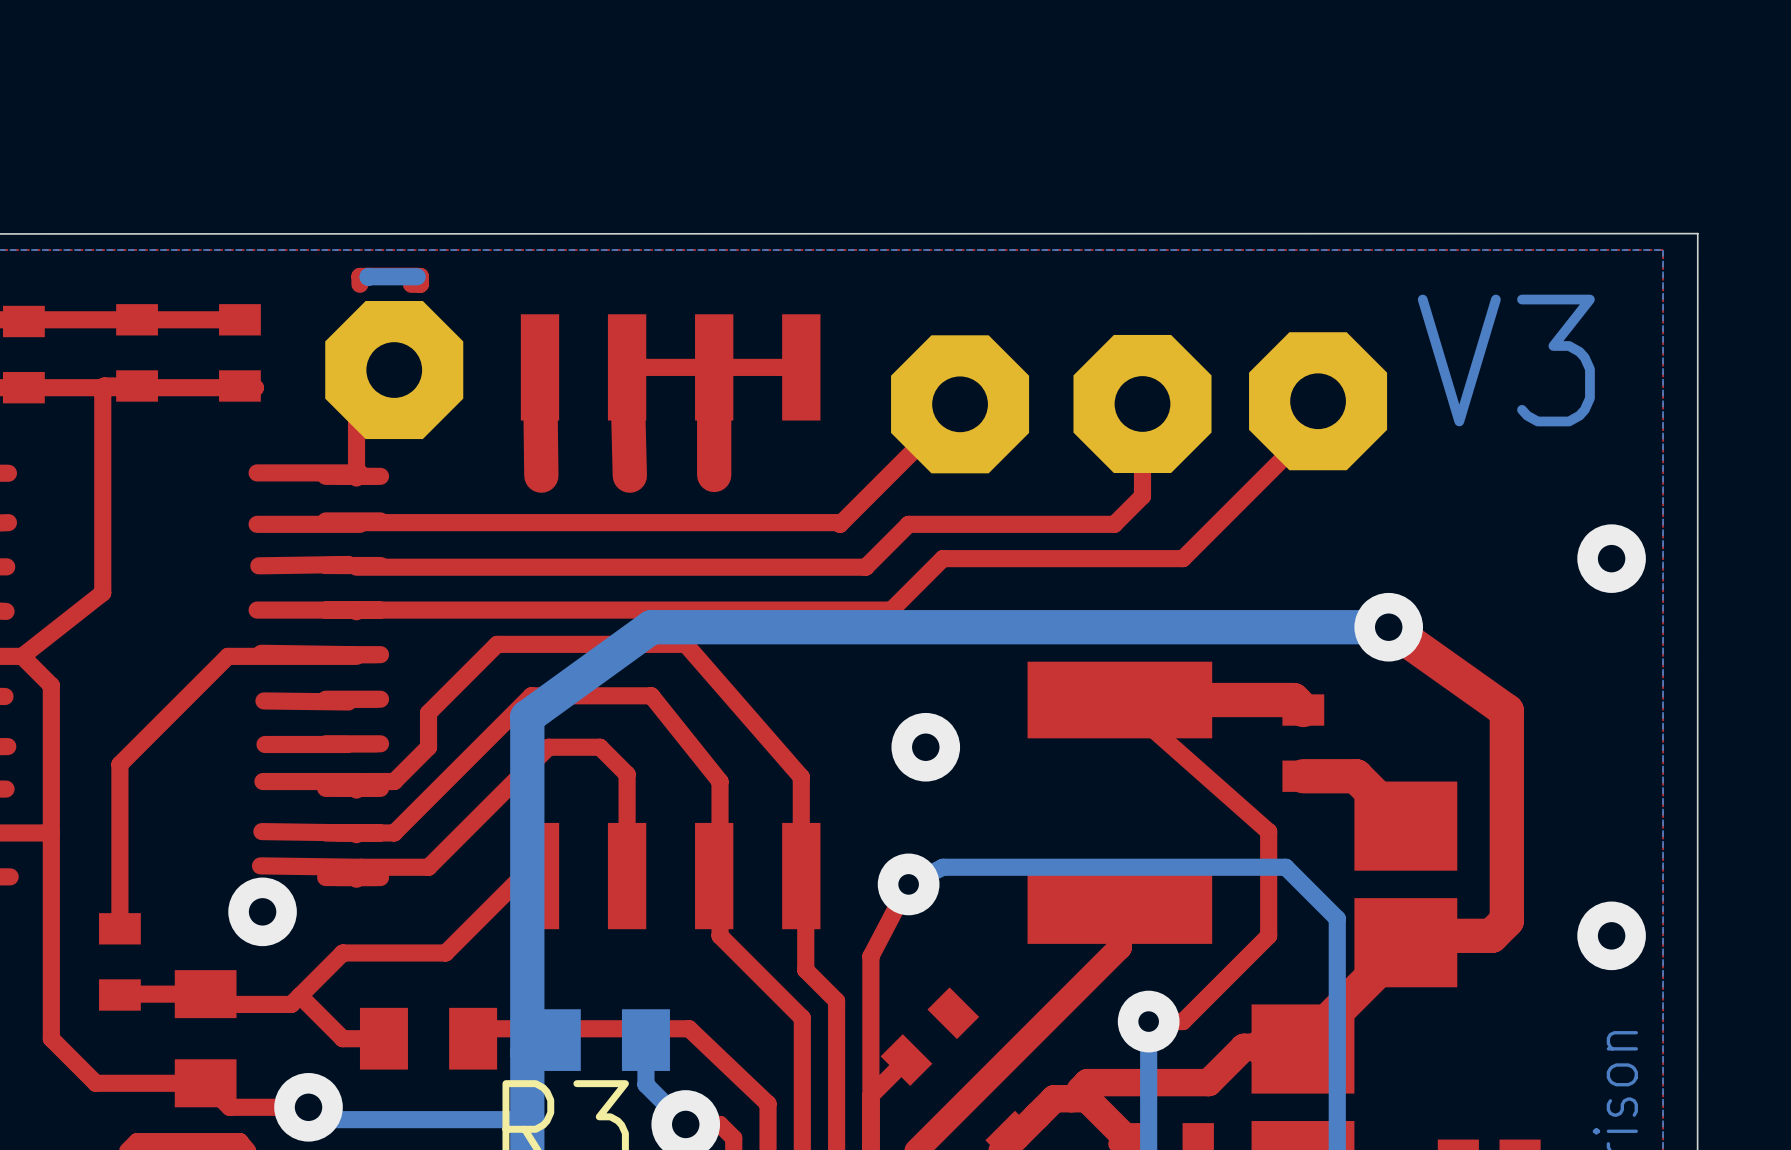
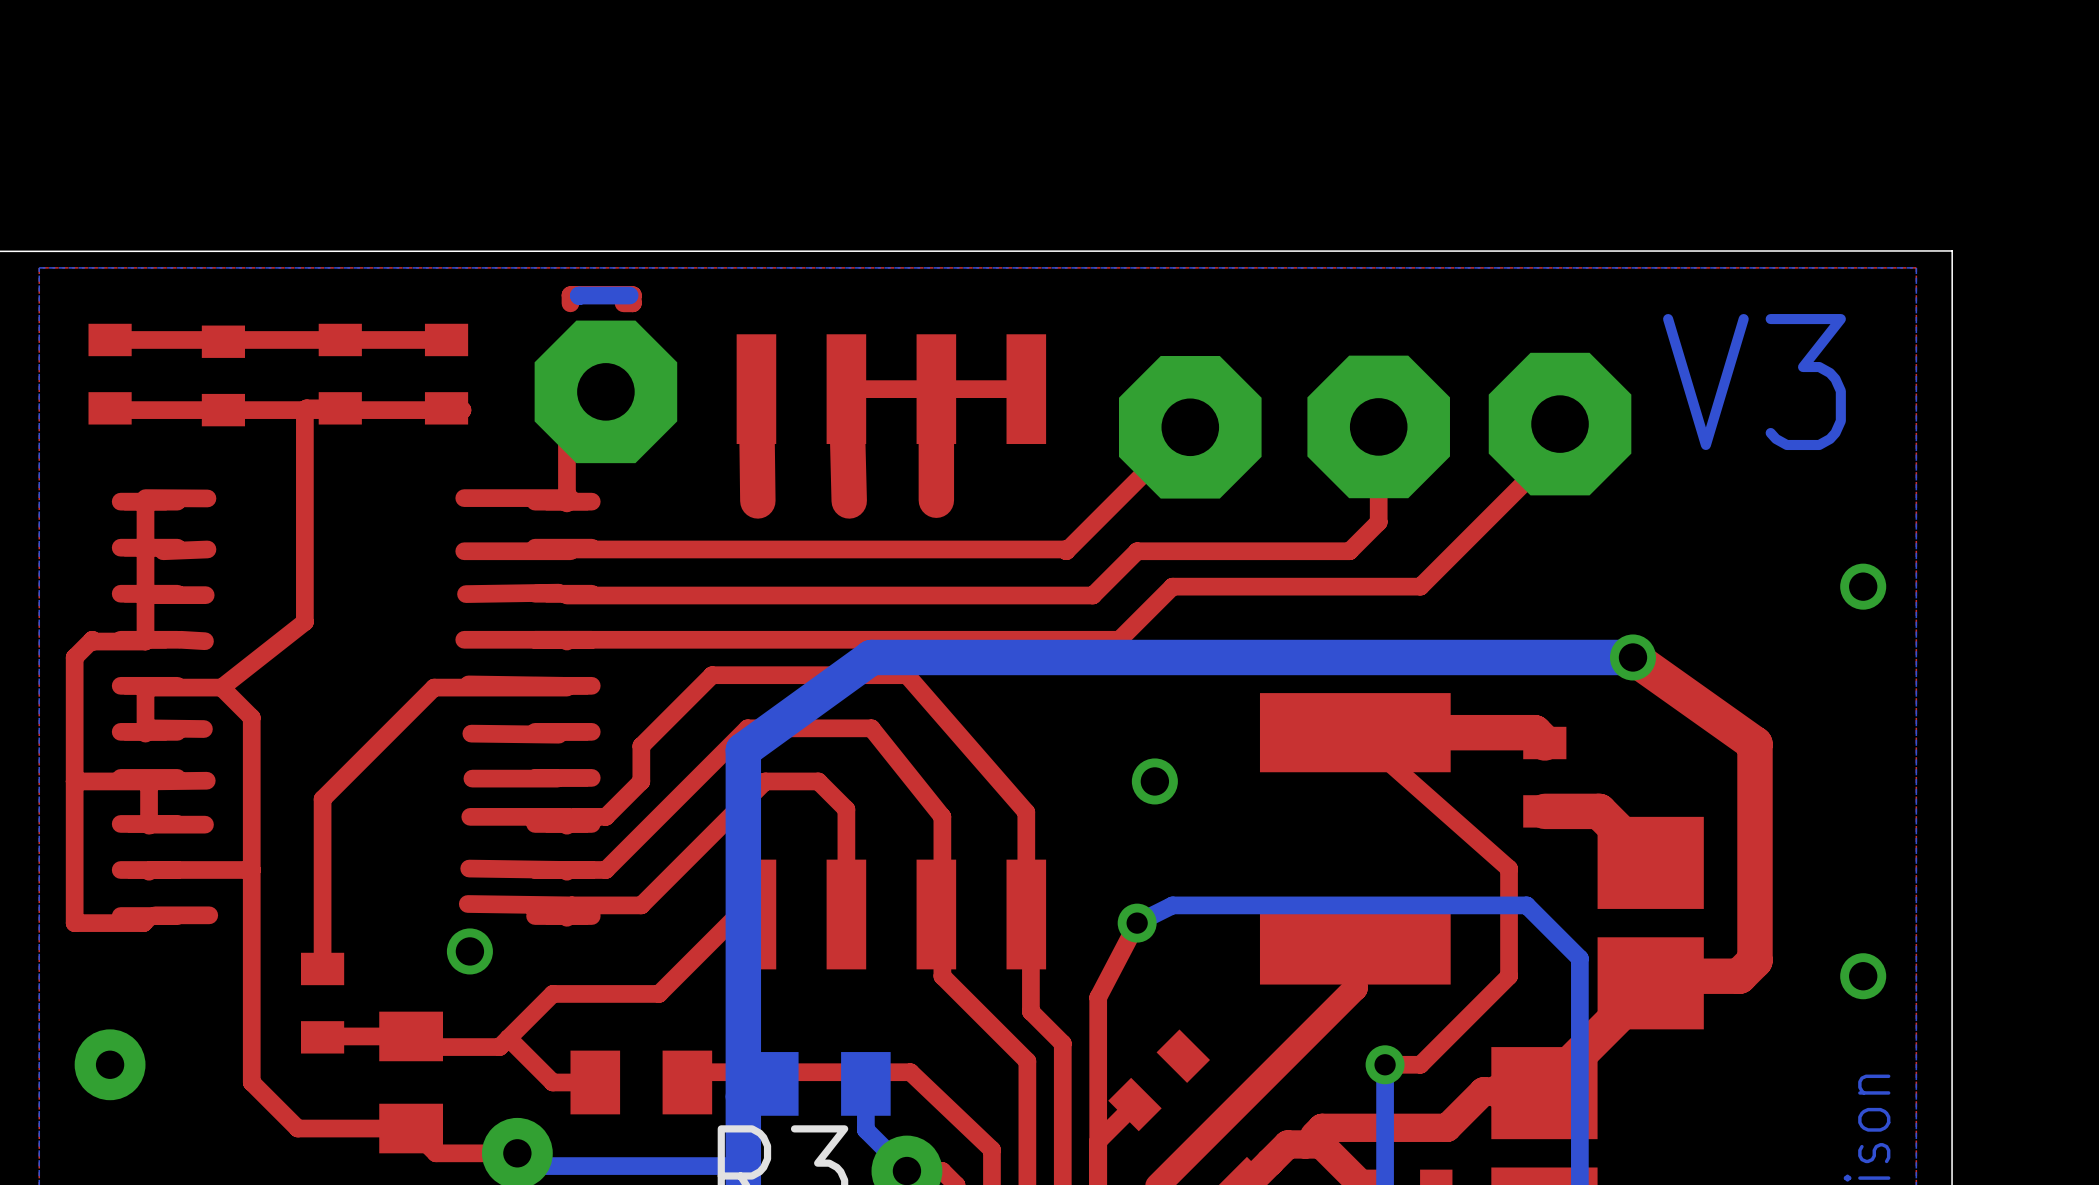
via size: [1577, 524, 1646, 593] -> [1840, 563, 1887, 610]
via size: [1354, 592, 1424, 662] -> [1609, 634, 1657, 681]
via size: [891, 712, 961, 782] -> [1131, 758, 1178, 805]
via size: [877, 853, 940, 916] -> [1117, 903, 1157, 943]
via size: [228, 877, 297, 947] -> [446, 928, 493, 975]
via size: [1577, 901, 1646, 971] -> [1840, 953, 1887, 1000]
via size: [1117, 990, 1180, 1053] -> [1365, 1045, 1405, 1085]

